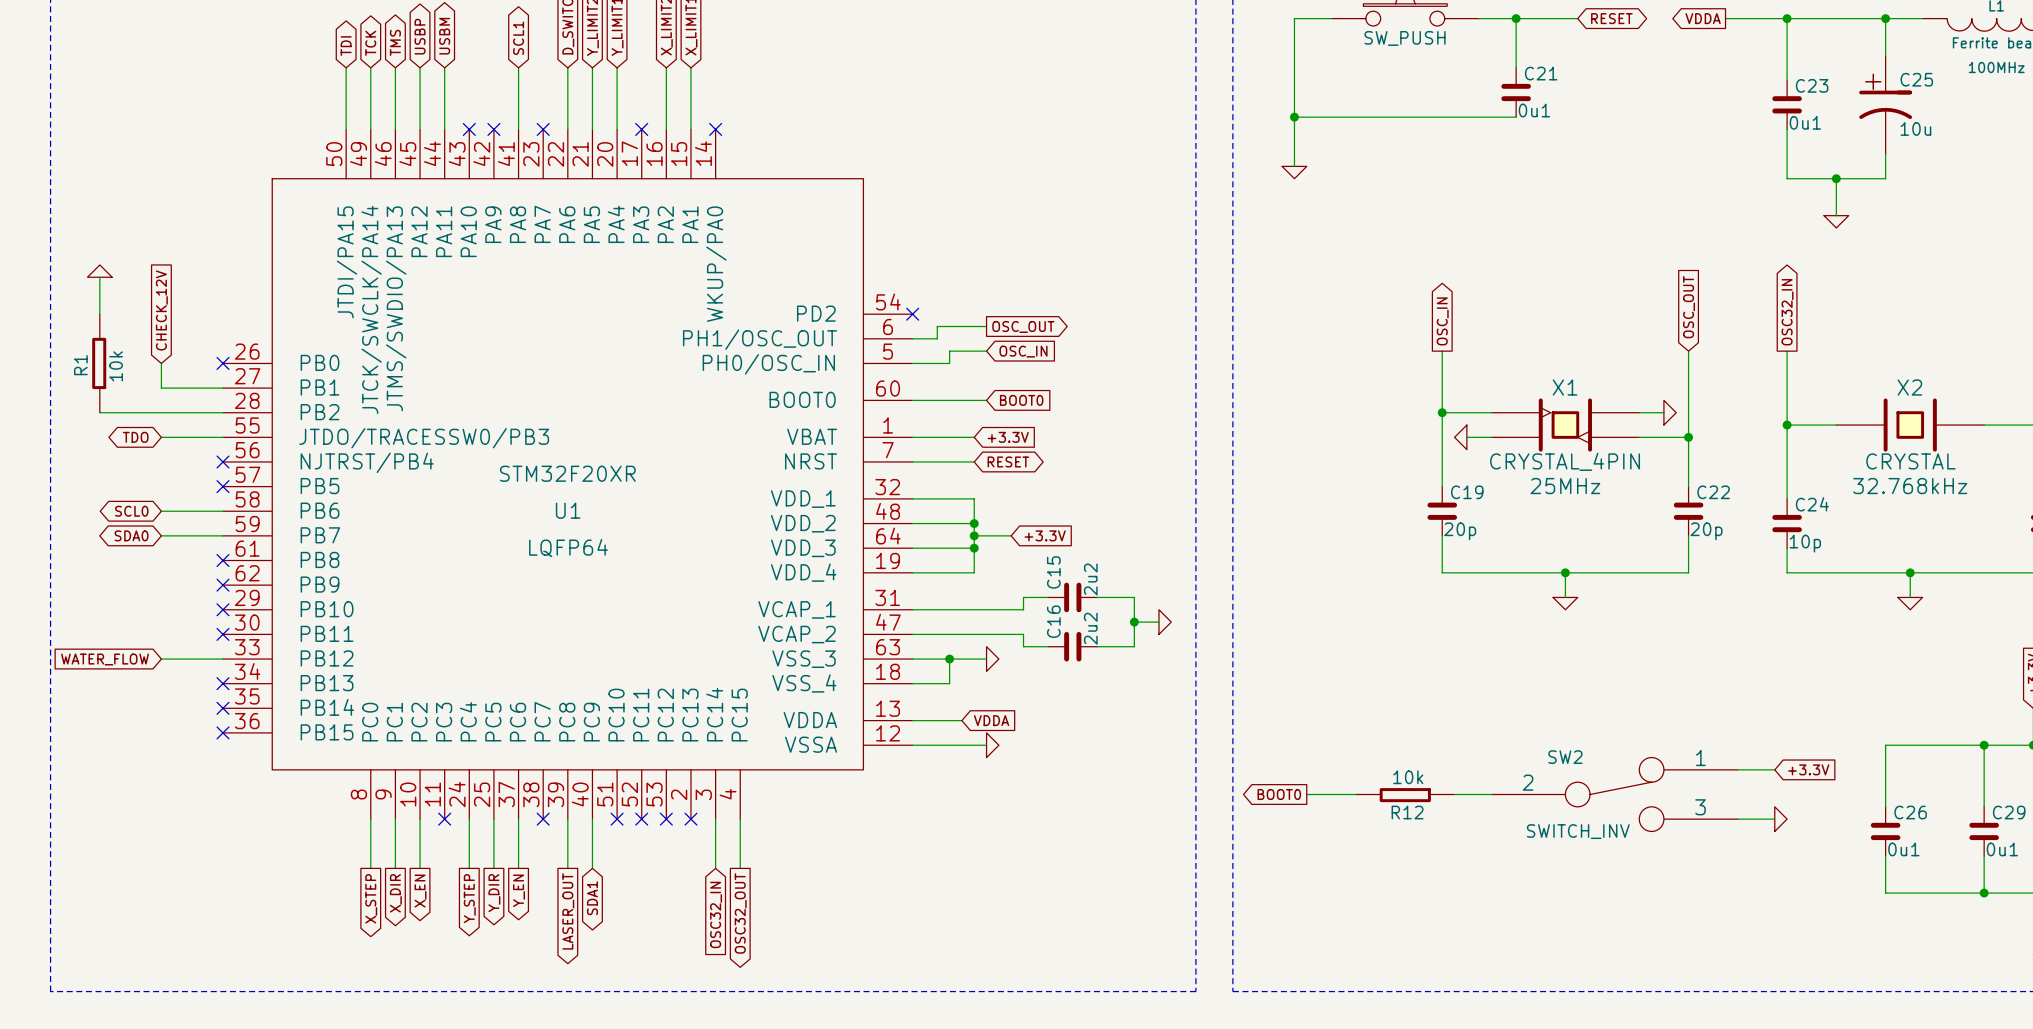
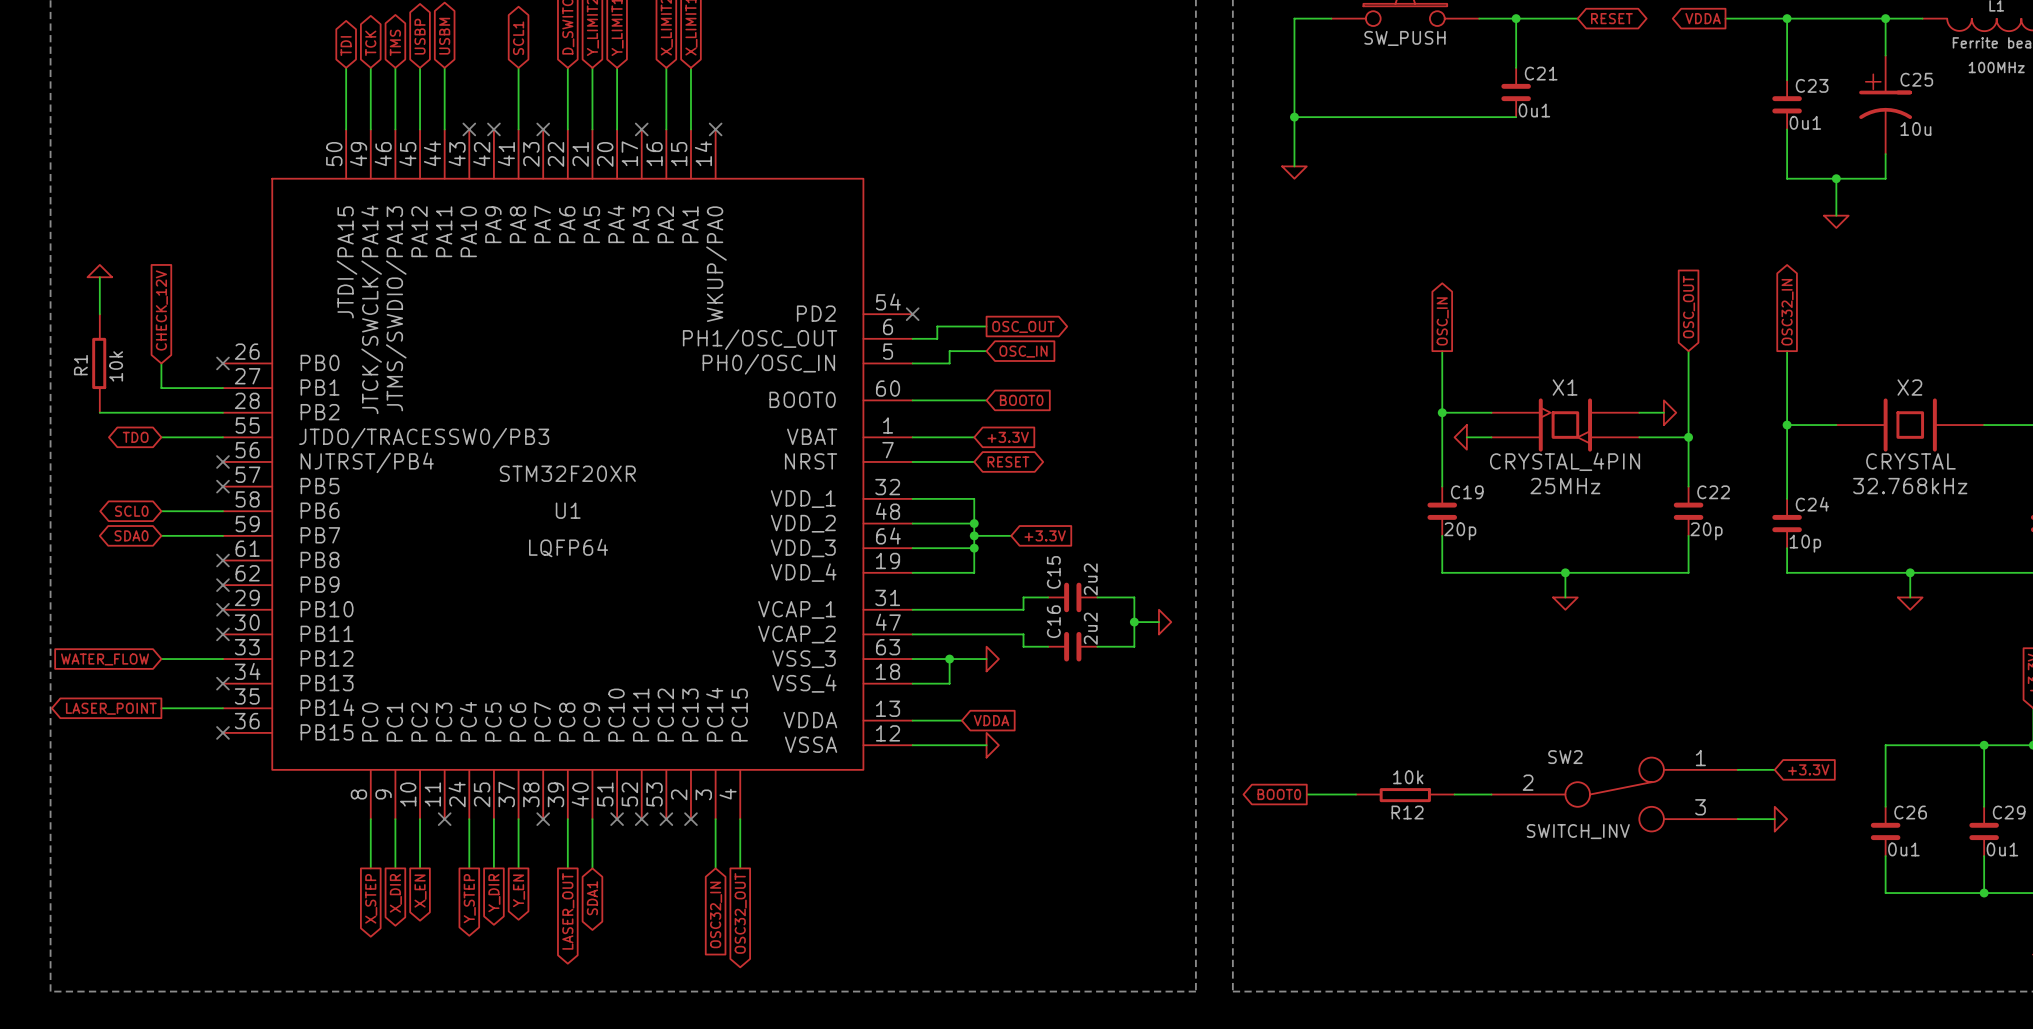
global label: none -> LASER_POINT (111, 708)
wire: none -> (161, 708) (222, 708)
no-connect mark: (222, 708) -> none

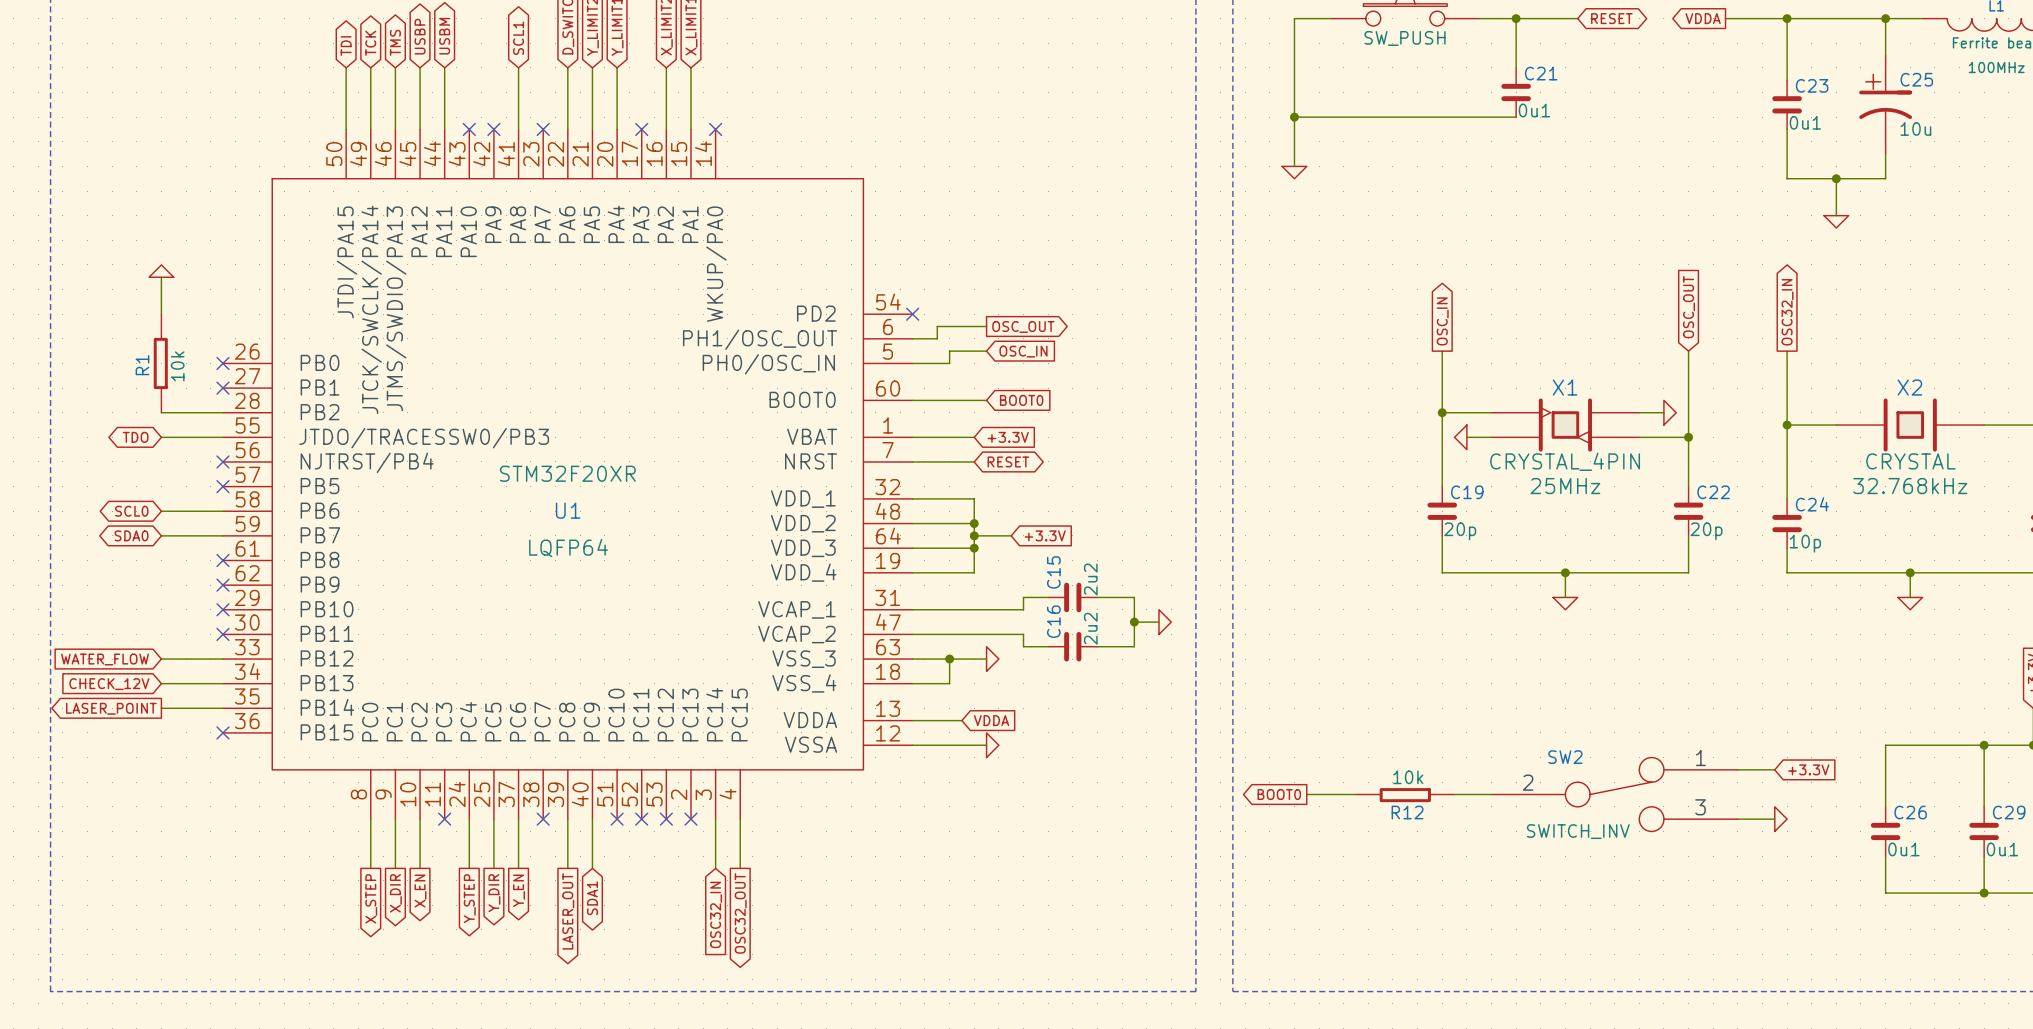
power symbol position: (99, 271) -> (161, 271)
wire: (99, 277) (99, 314) -> (161, 277) (161, 314)
global label: CHECK_12V (161, 310) -> none
R1 position: (99, 363) -> (160, 363)
wire: (161, 363) (161, 388) (222, 388) -> none
no-connect mark: none -> (222, 388)
wire: (99, 412) (161, 412) -> none
wire: none -> (161, 683) (222, 683)
no-connect mark: (222, 683) -> none
global label: none -> CHECK_12V (109, 684)

